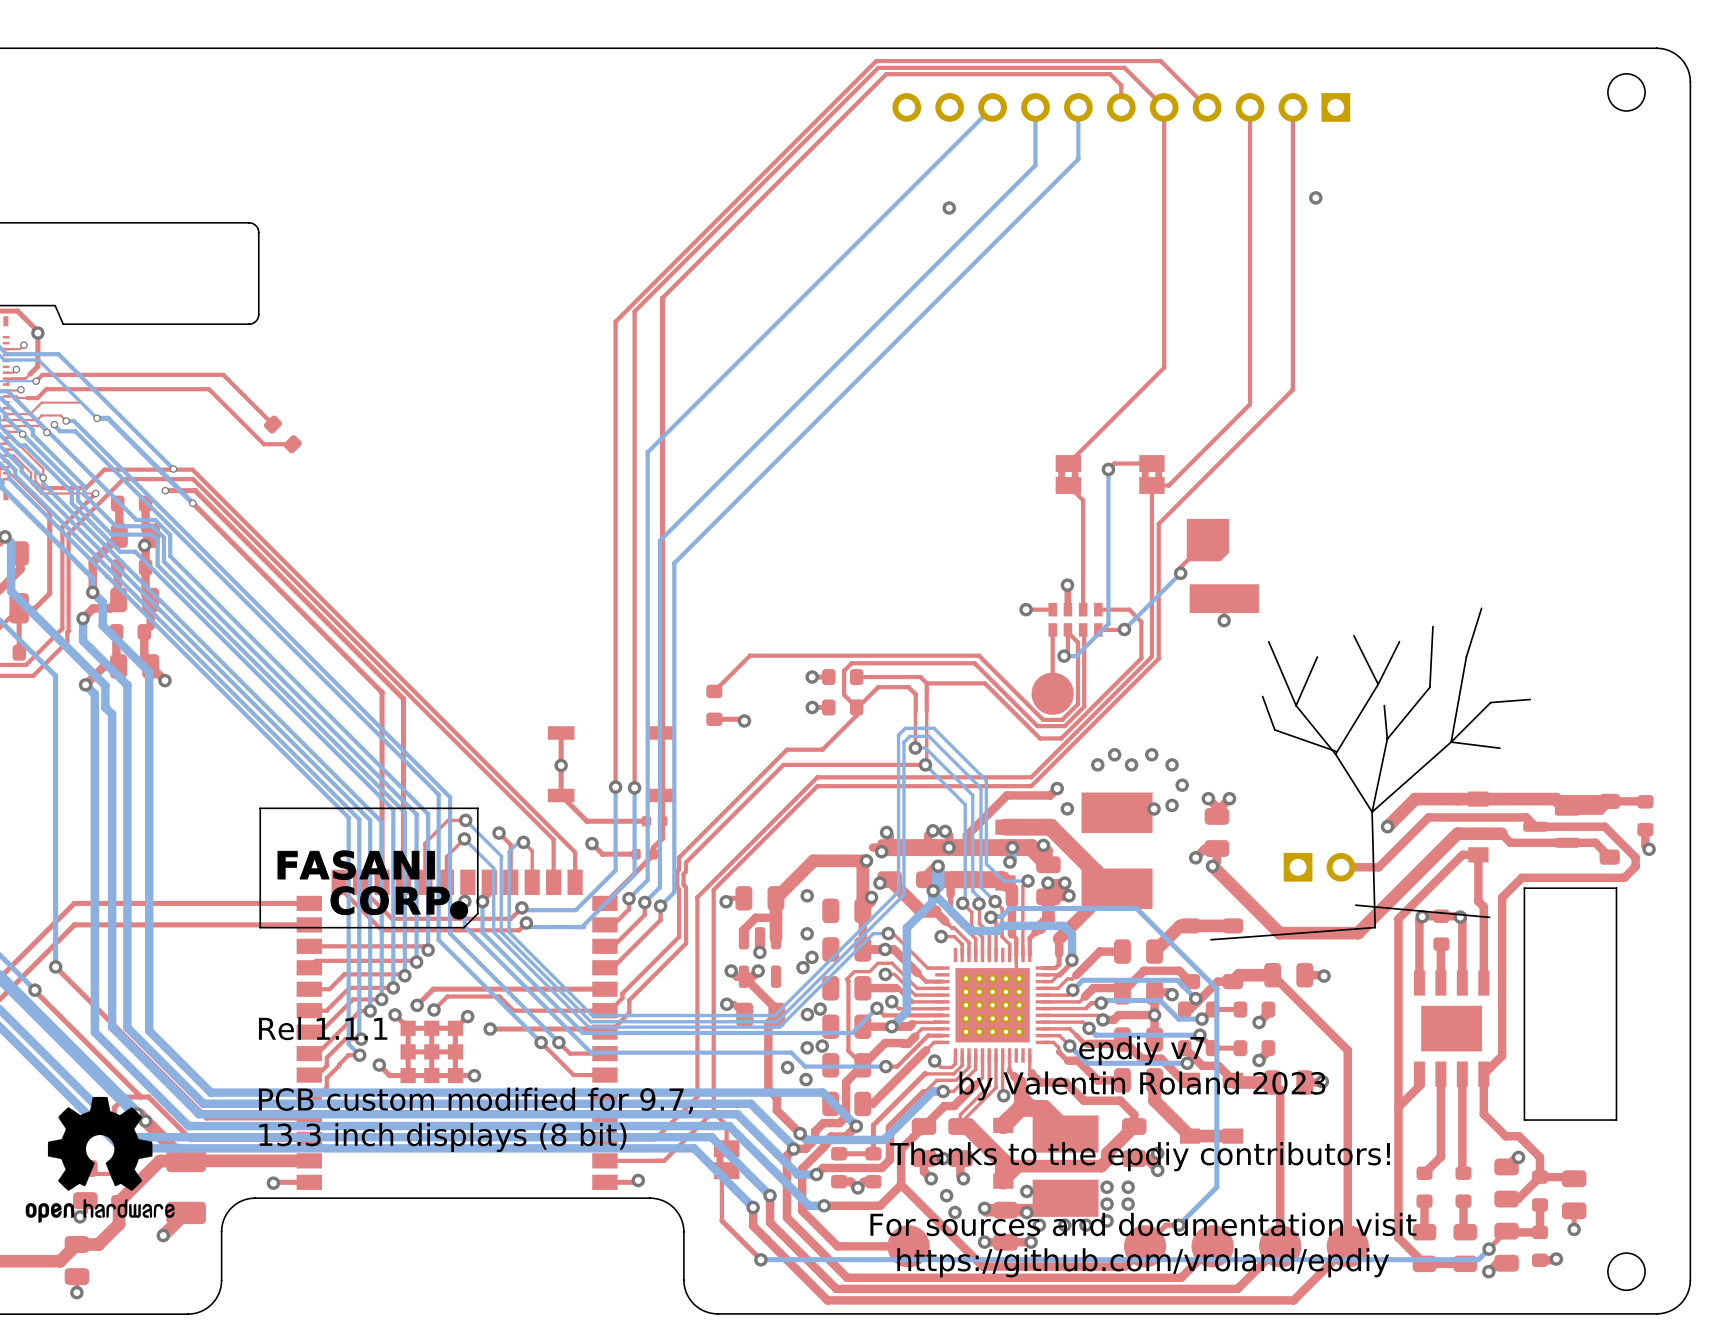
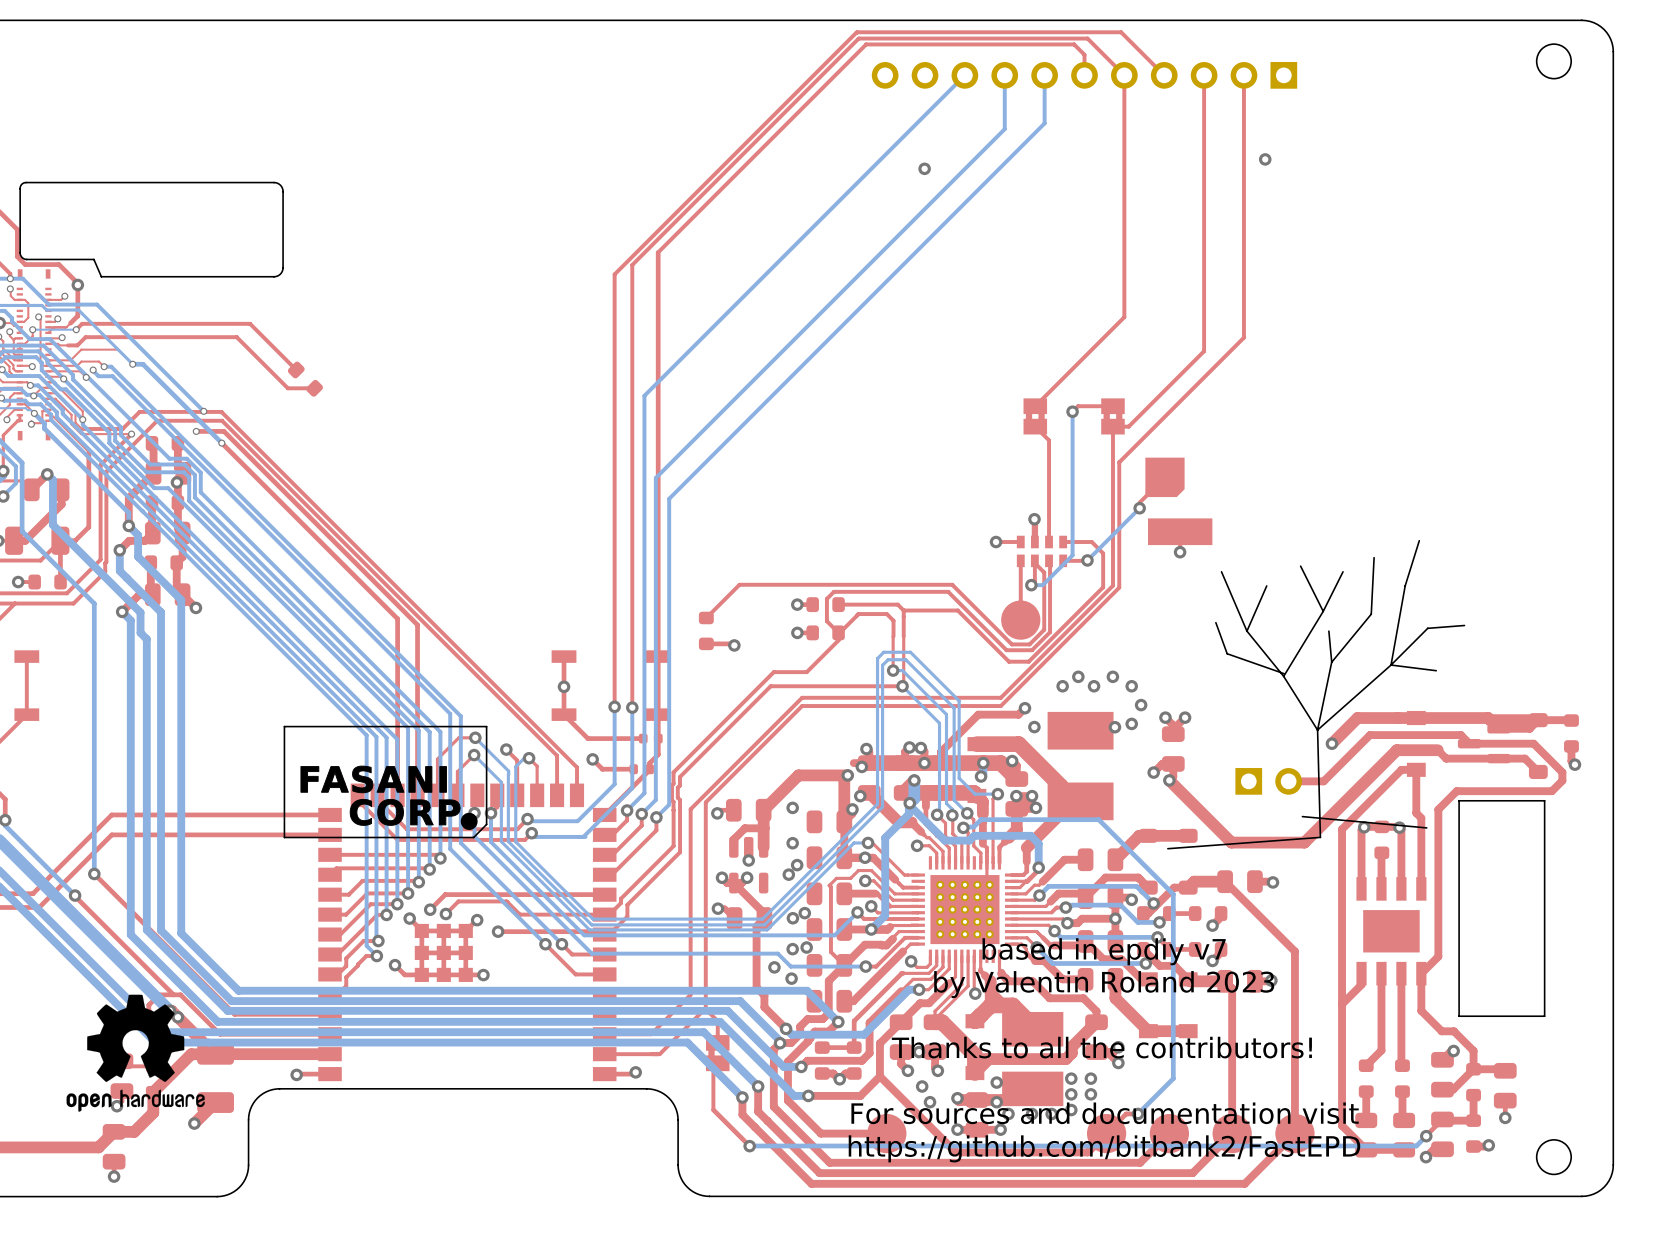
text: Rel 1.1.1 (323, 1028) -> none
text: epdiy v7 (1141, 1050) -> based in epdiy v7 (1104, 951)
text: PCB custom modified for 9.7, (475, 1100) -> none
text: 13.3 inch displays (8 bit) (442, 1137) -> none
text: Thanks to the epdiy contributors! (1139, 1156) -> Thanks to all the contributors! (1101, 1047)
text: https://github.com/vroland/epdiy (1143, 1262) -> https://github.com/bitbank2/FastEPD (1104, 1148)

